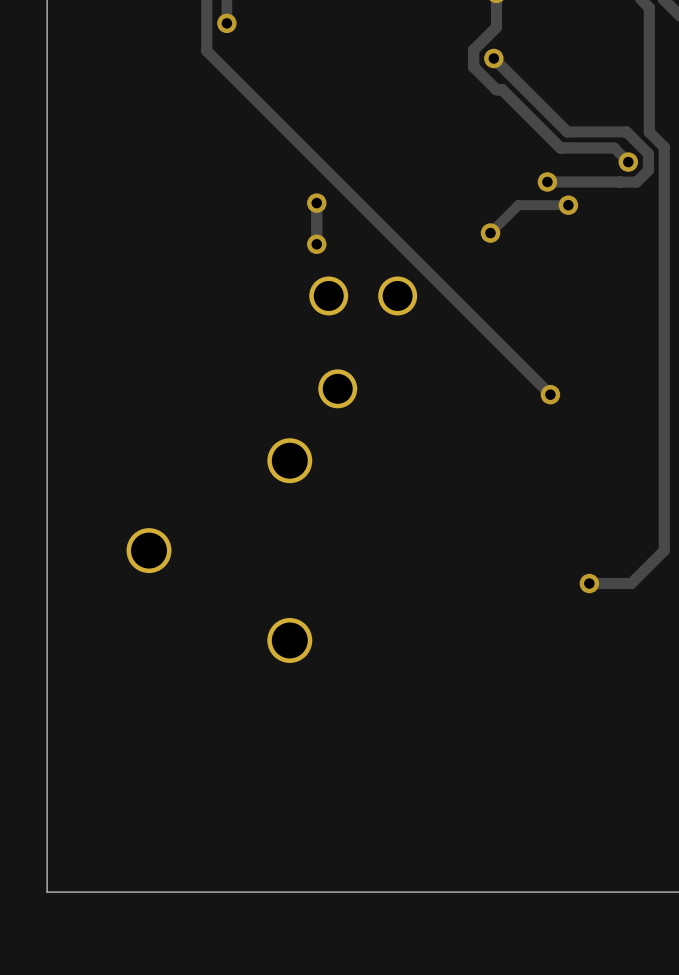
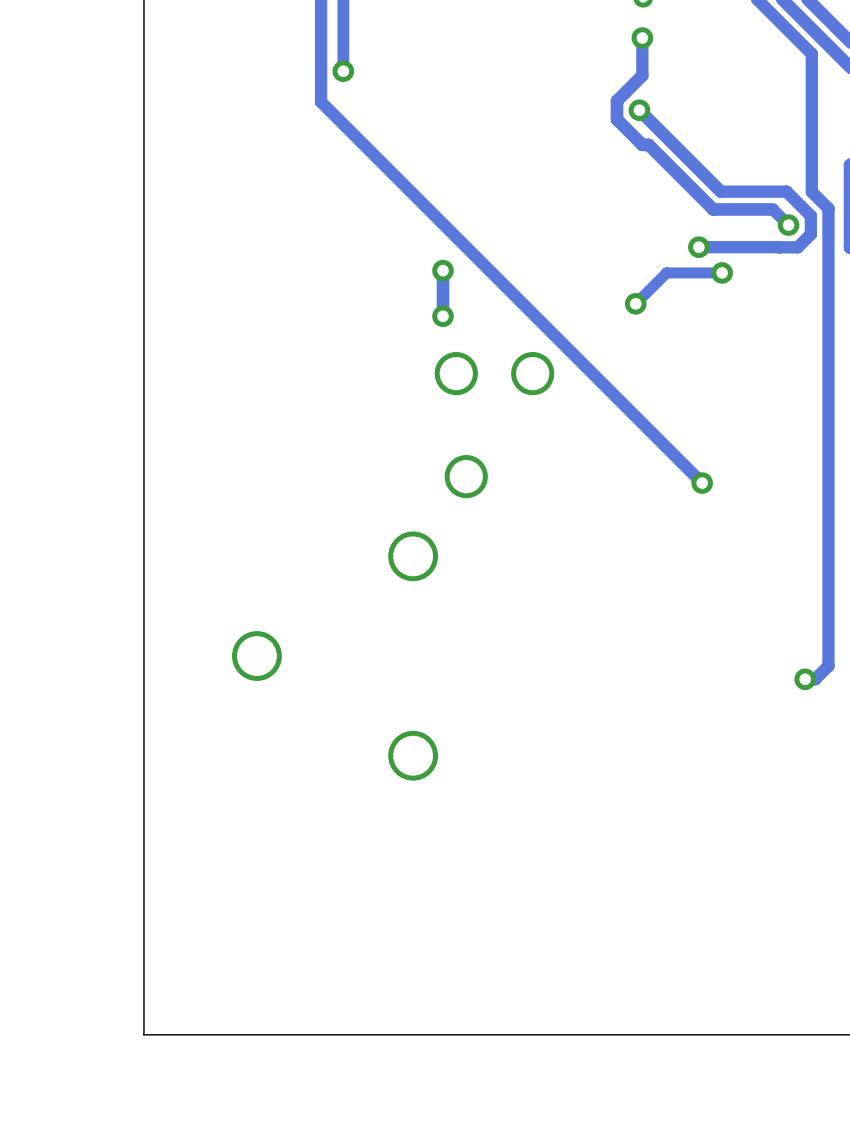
track: (664, 550) (631, 583) (589, 583) -> (828, 656) (828, 666) (815, 679) (805, 679)
via position: (589, 583) -> (805, 679)

